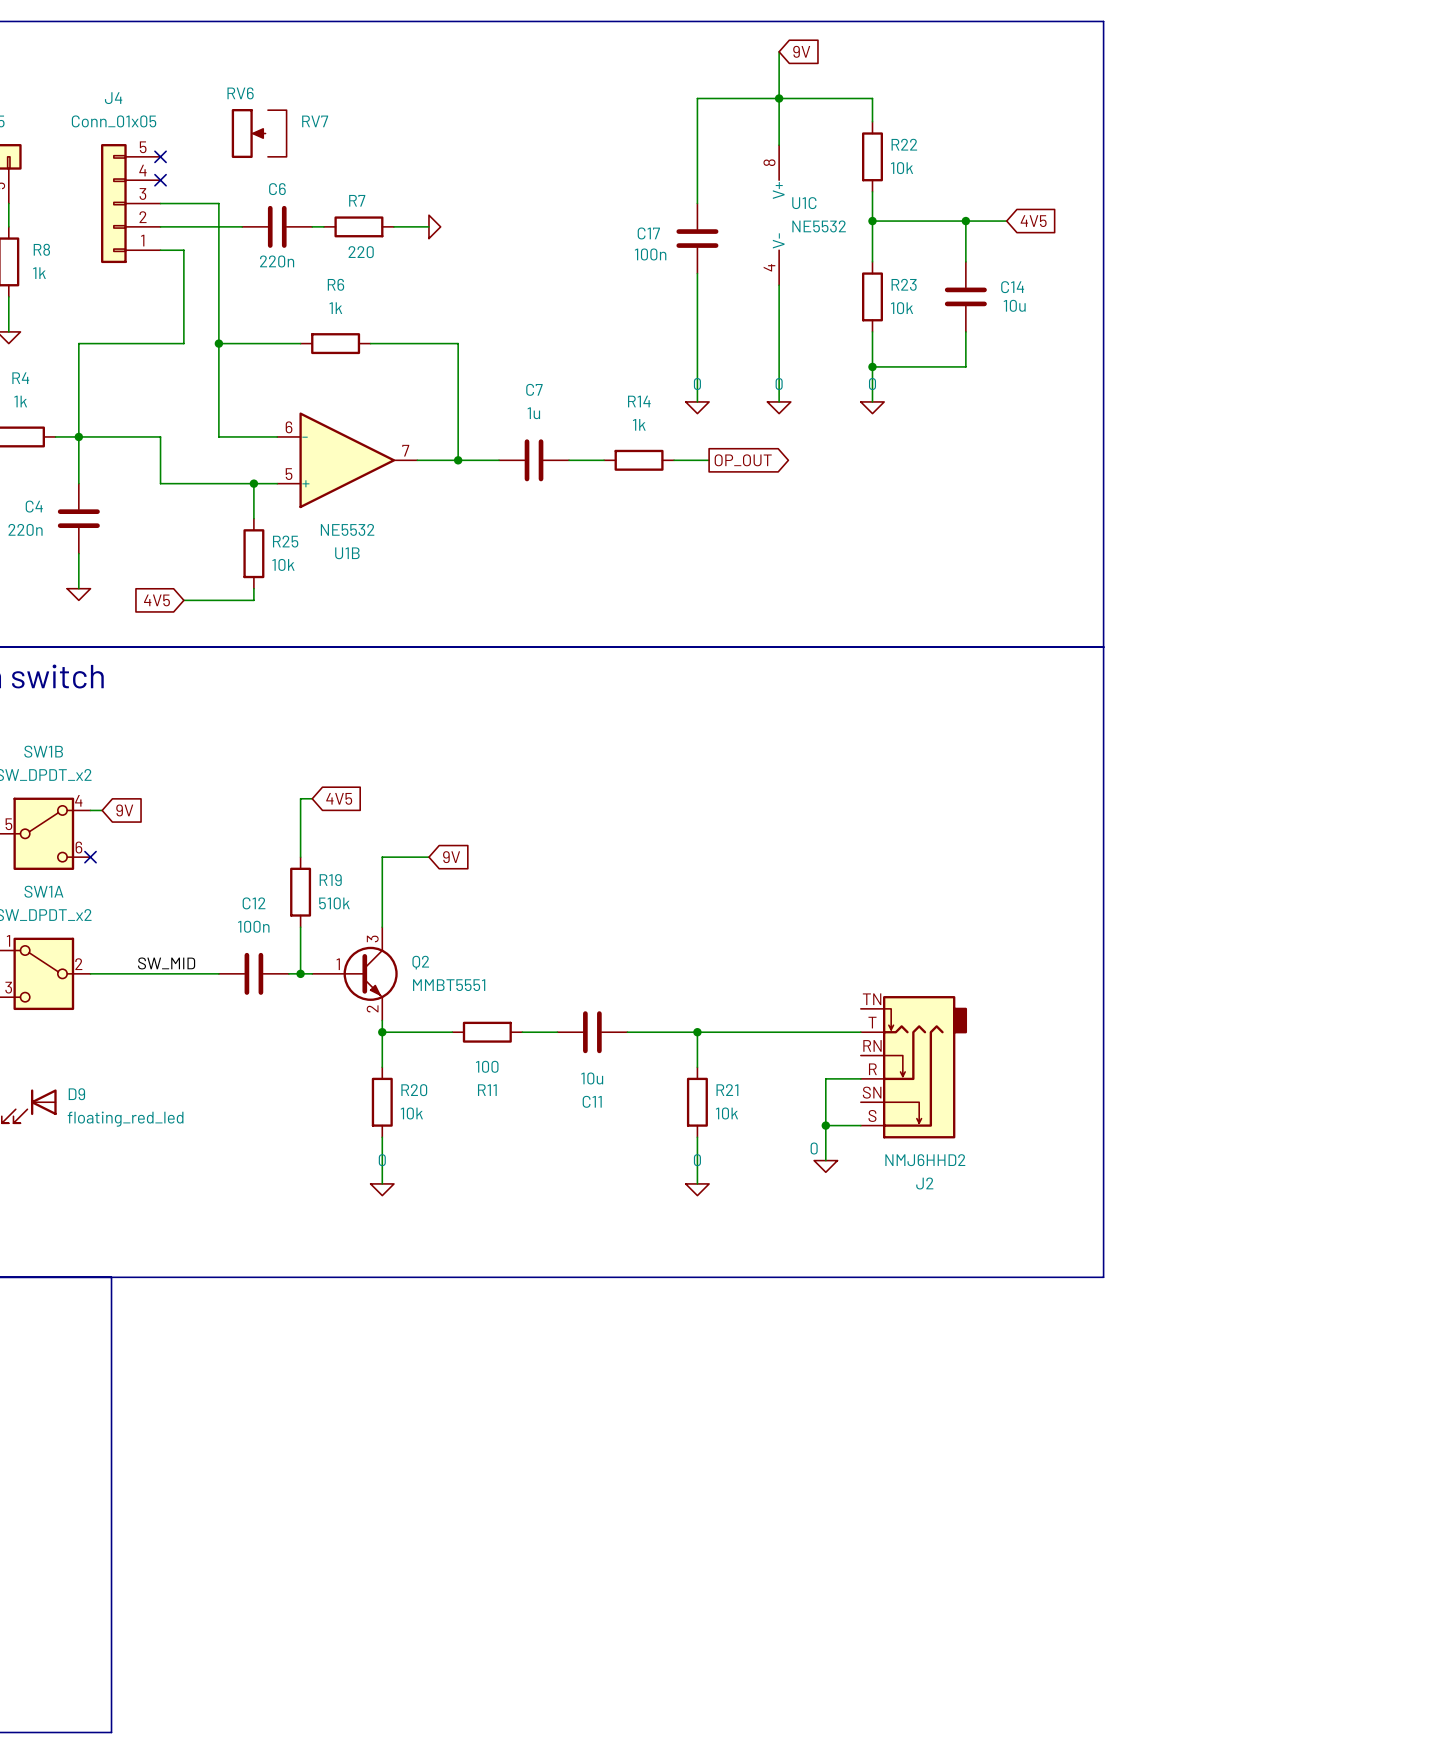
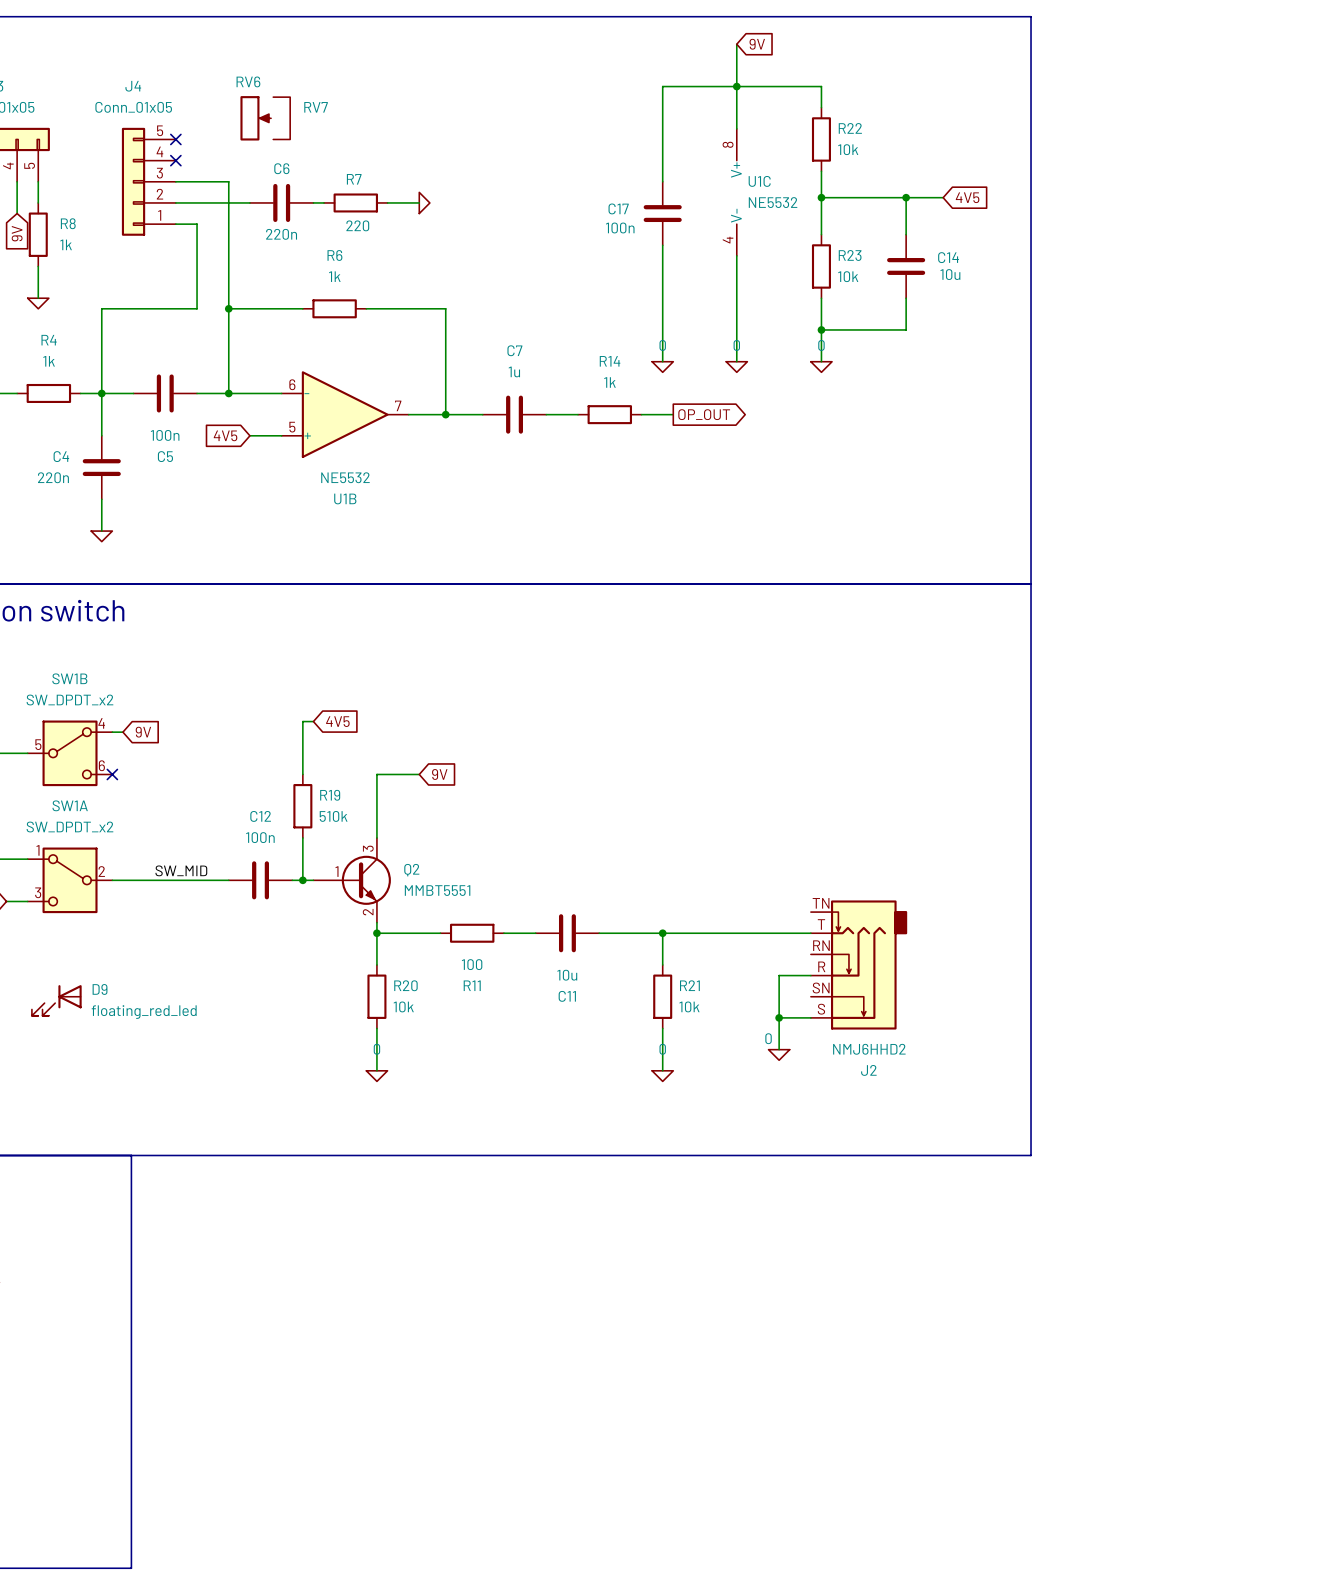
wire: (113, 436) (160, 436) (160, 483) (242, 483) -> none
C5: none -> 100n (165, 393)
wire: none -> (197, 393) (228, 393)
junction: none -> (228, 393)
wire: (253, 483) (253, 518) -> none
junction: (253, 483) -> none
R25: 10k (253, 553) -> none
wire: (253, 588) (253, 600) (183, 600) -> none
global label position: 4V5 (156, 600) -> 4V5 (225, 435)

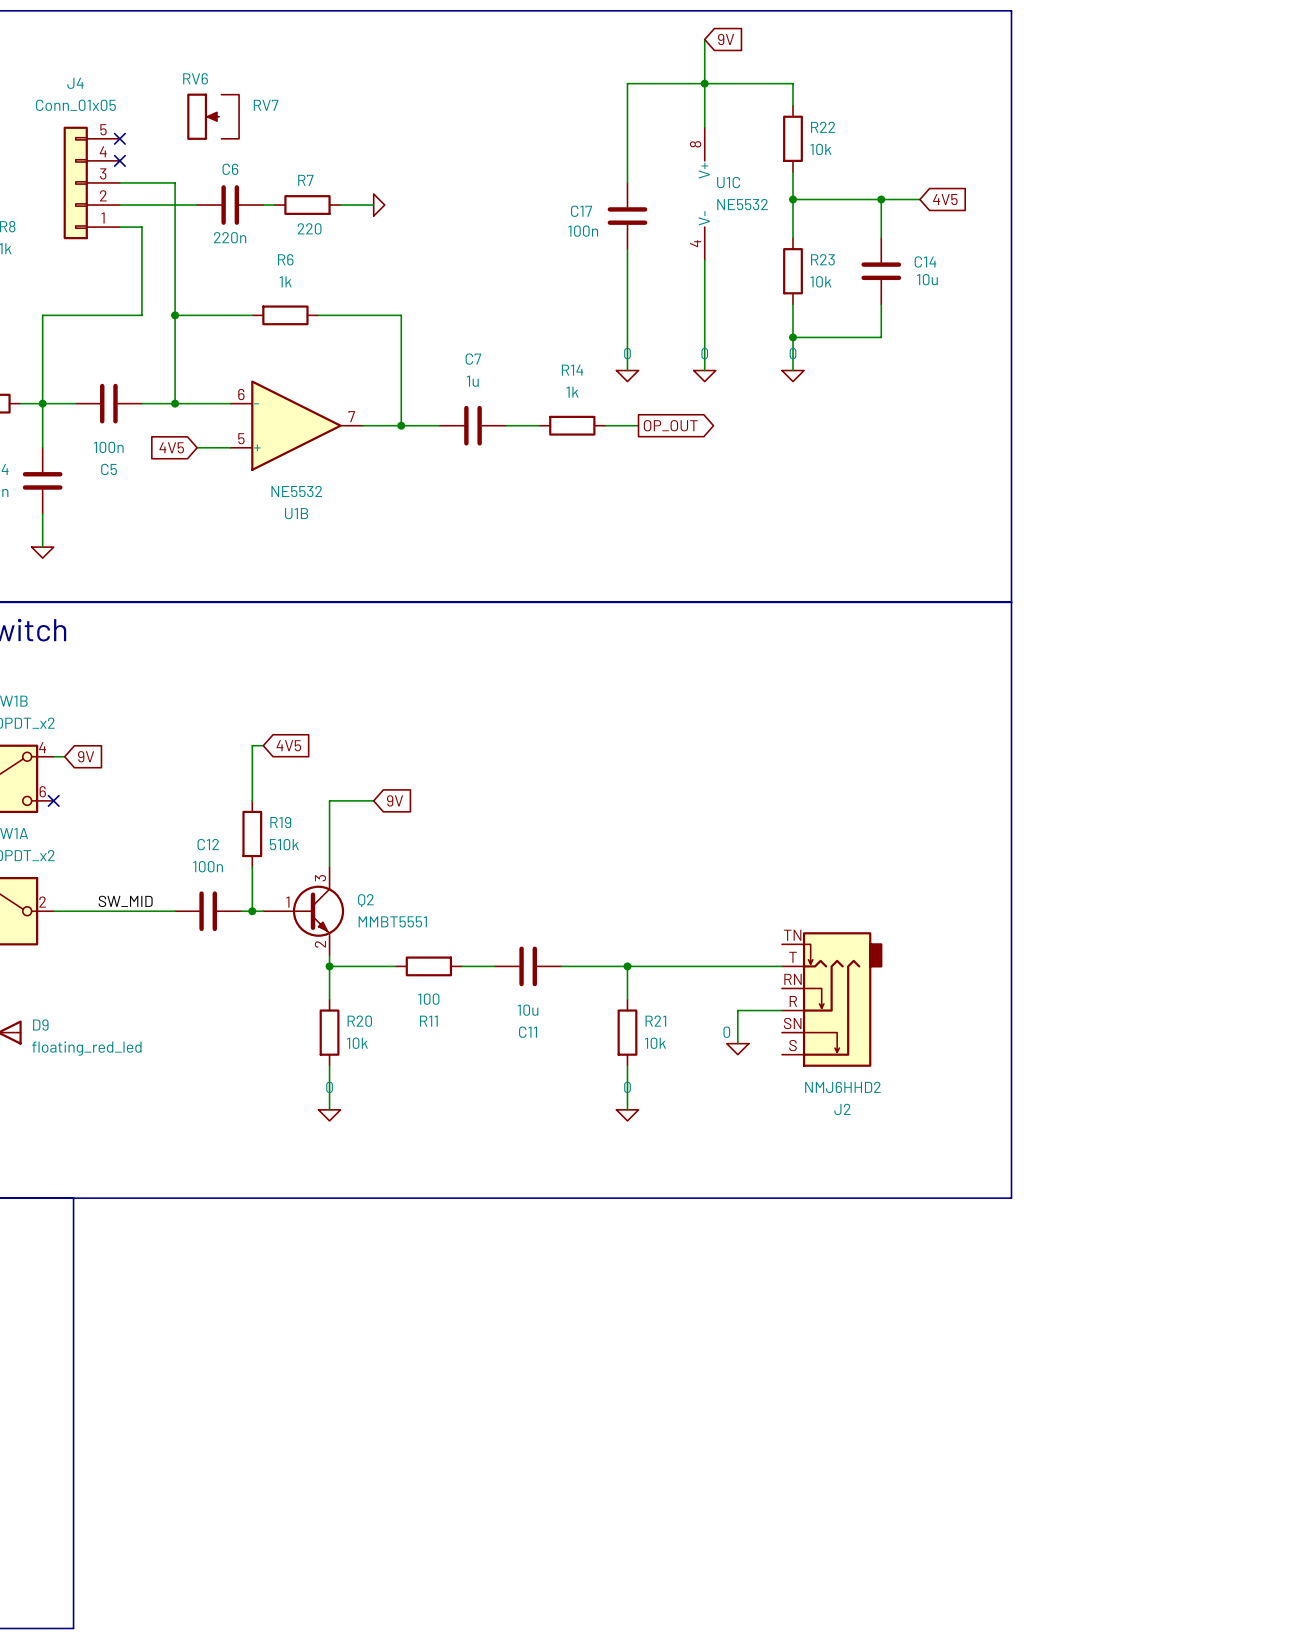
wire: (779, 975) (779, 1049) -> (748, 1010) (737, 1010) (737, 1043)
wire: (779, 1017) (810, 1017) -> none
junction: (779, 1017) -> none
power symbol position: 0 (779, 1054) -> 0 (737, 1049)

